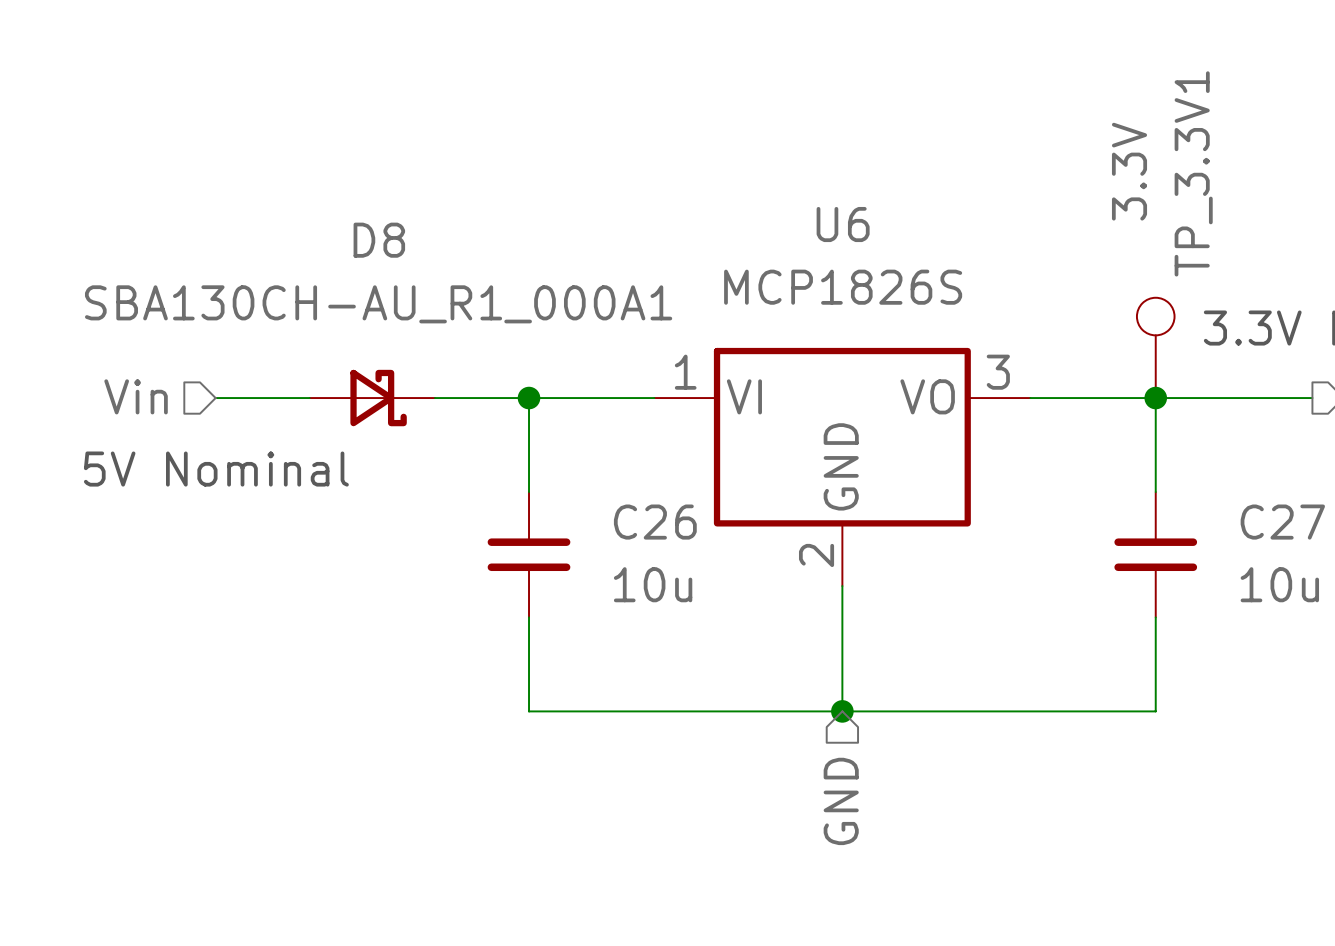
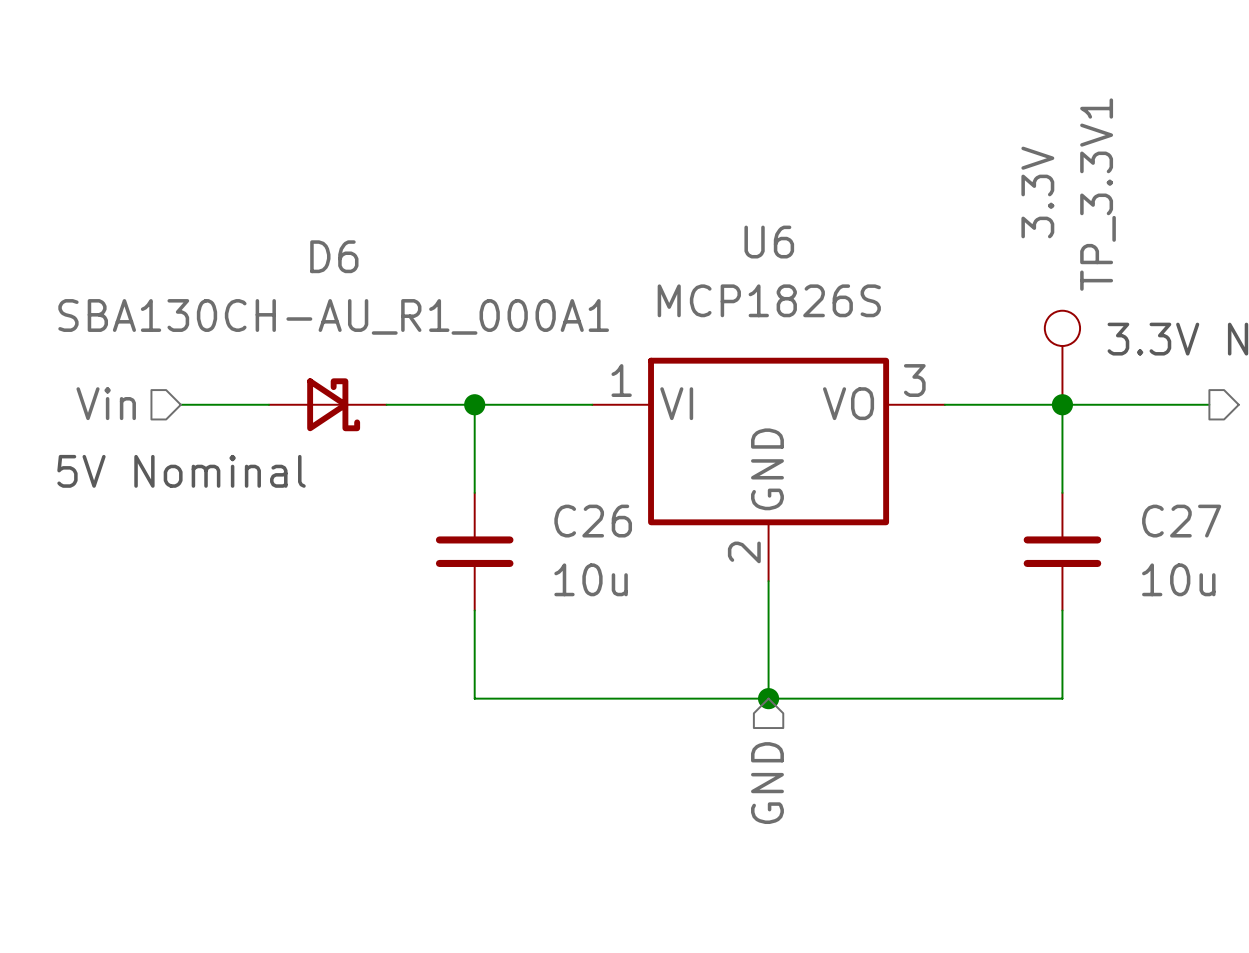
D8 name: D8 (379, 240) -> D6 (334, 256)

